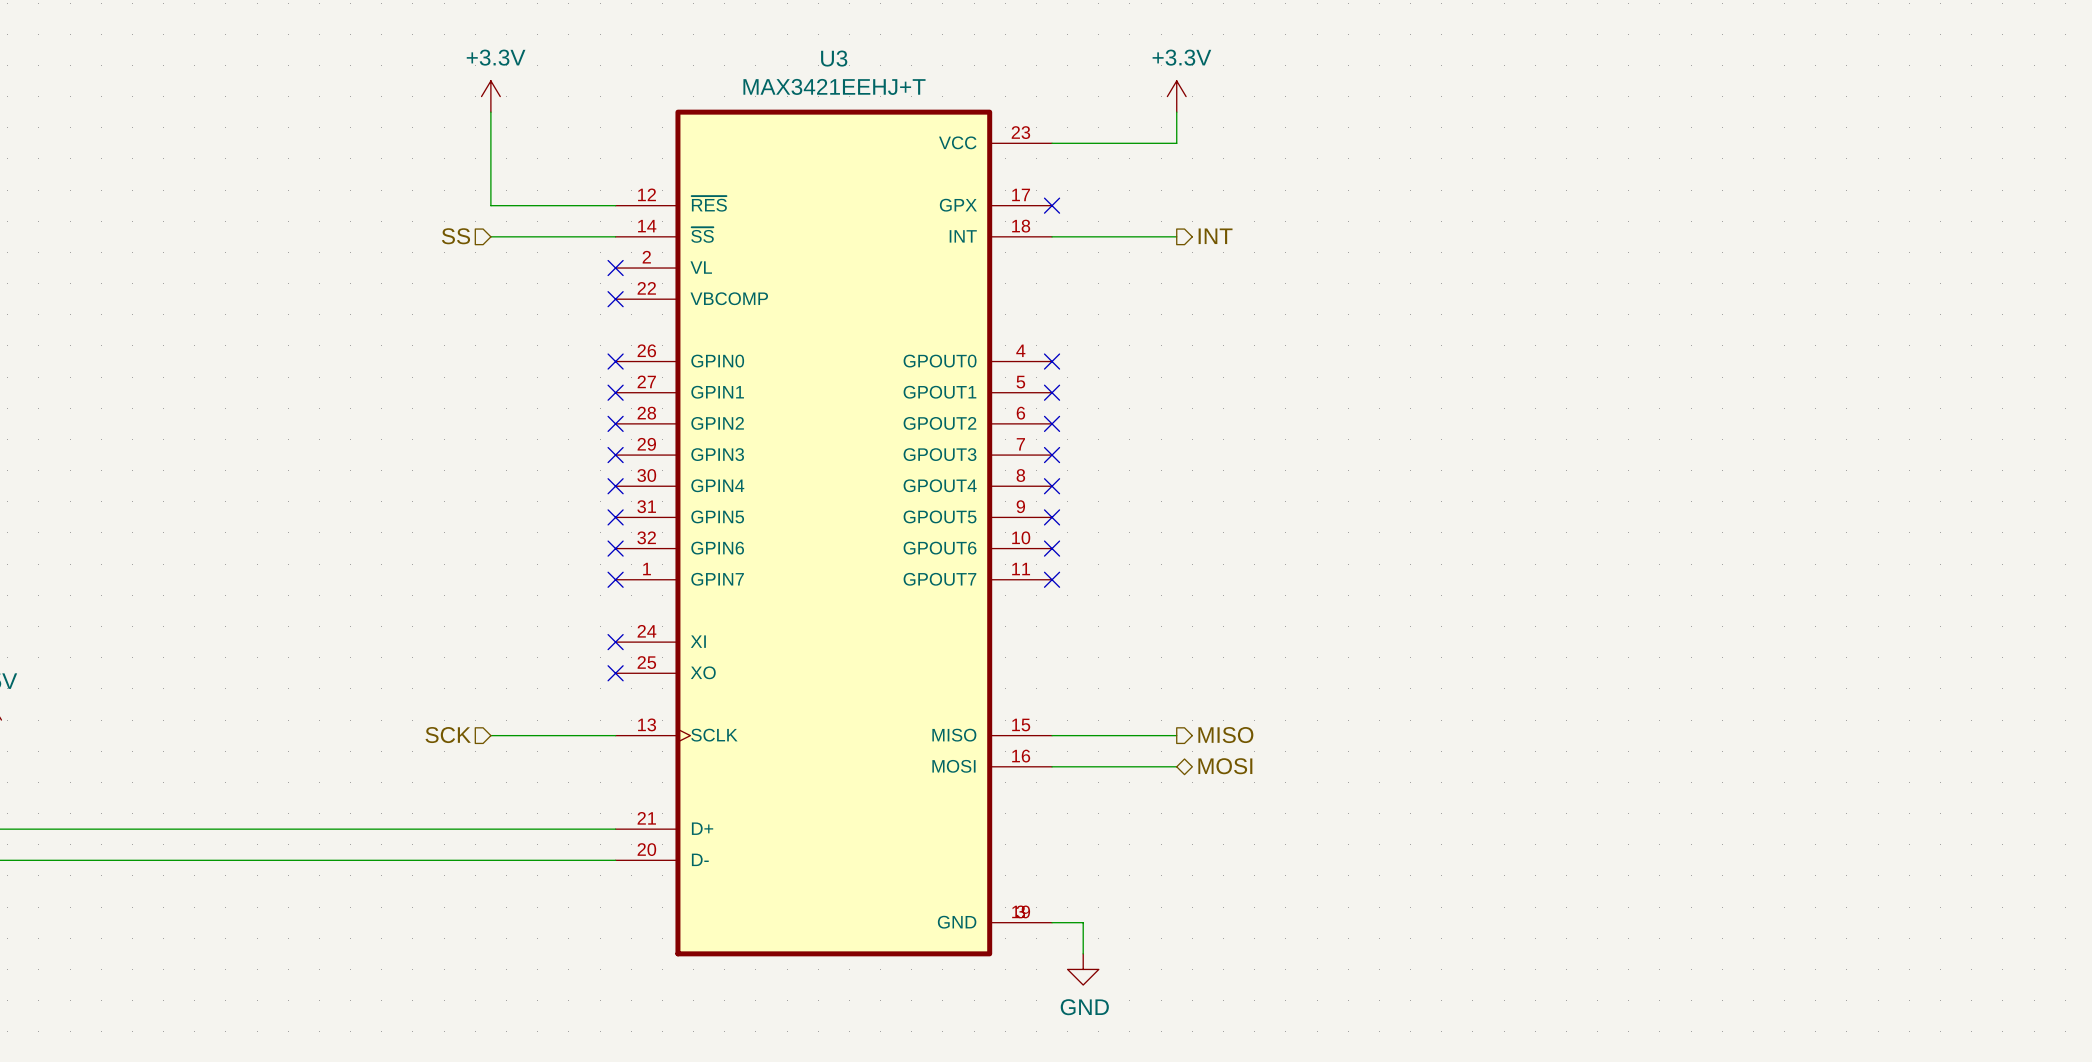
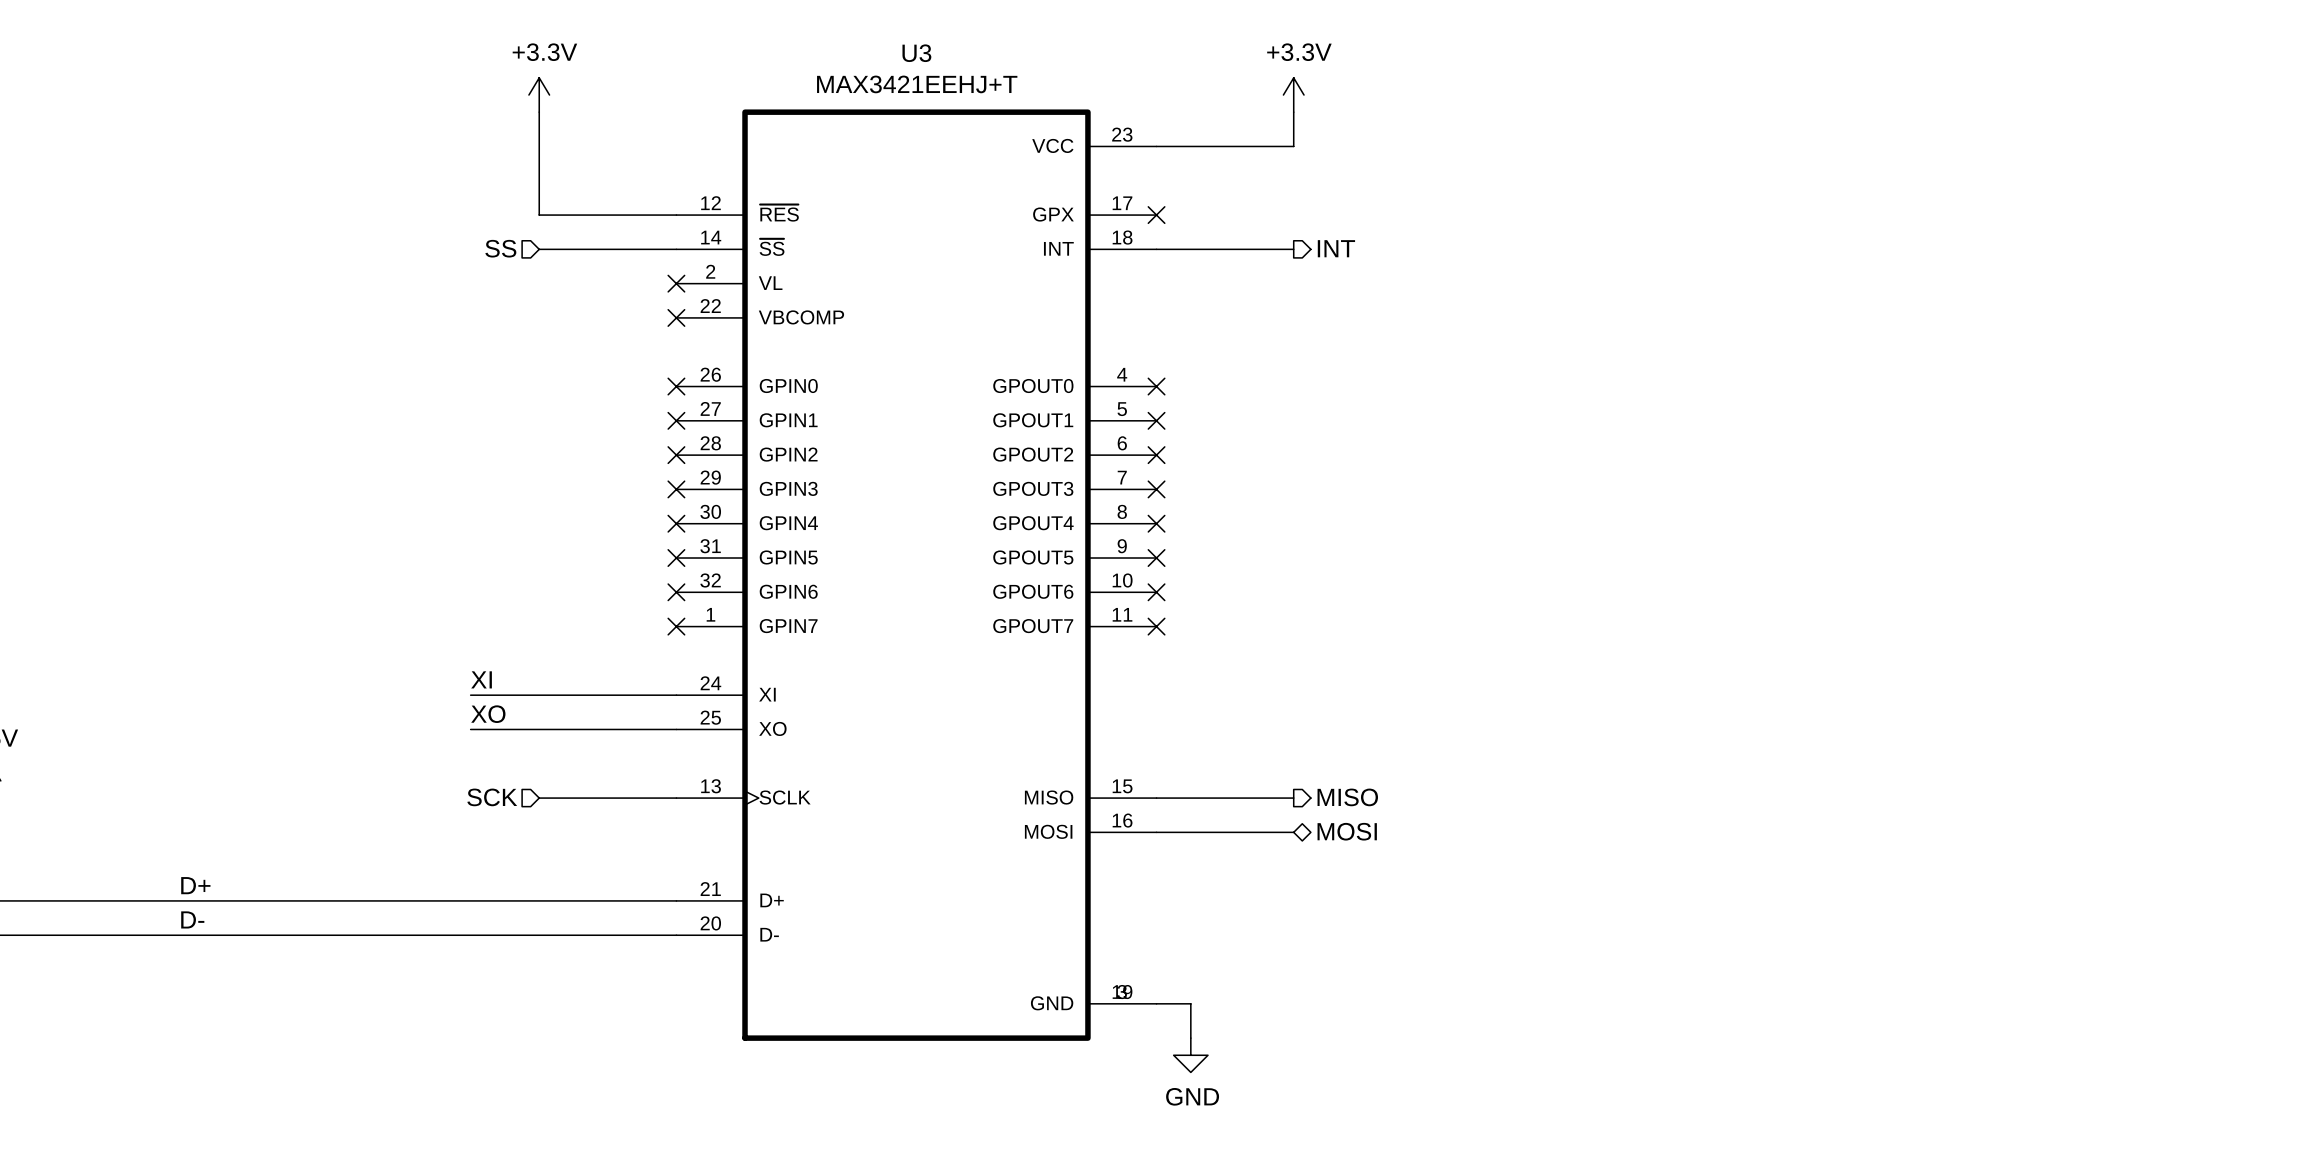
label: none -> XI (481, 679)
wire: none -> (470, 695) (676, 695)
no-connect mark: (615, 642) -> none
label: none -> XO (488, 714)
wire: none -> (470, 729) (676, 729)
no-connect mark: (615, 673) -> none
label: none -> D+ (195, 885)
label: none -> D- (192, 919)

